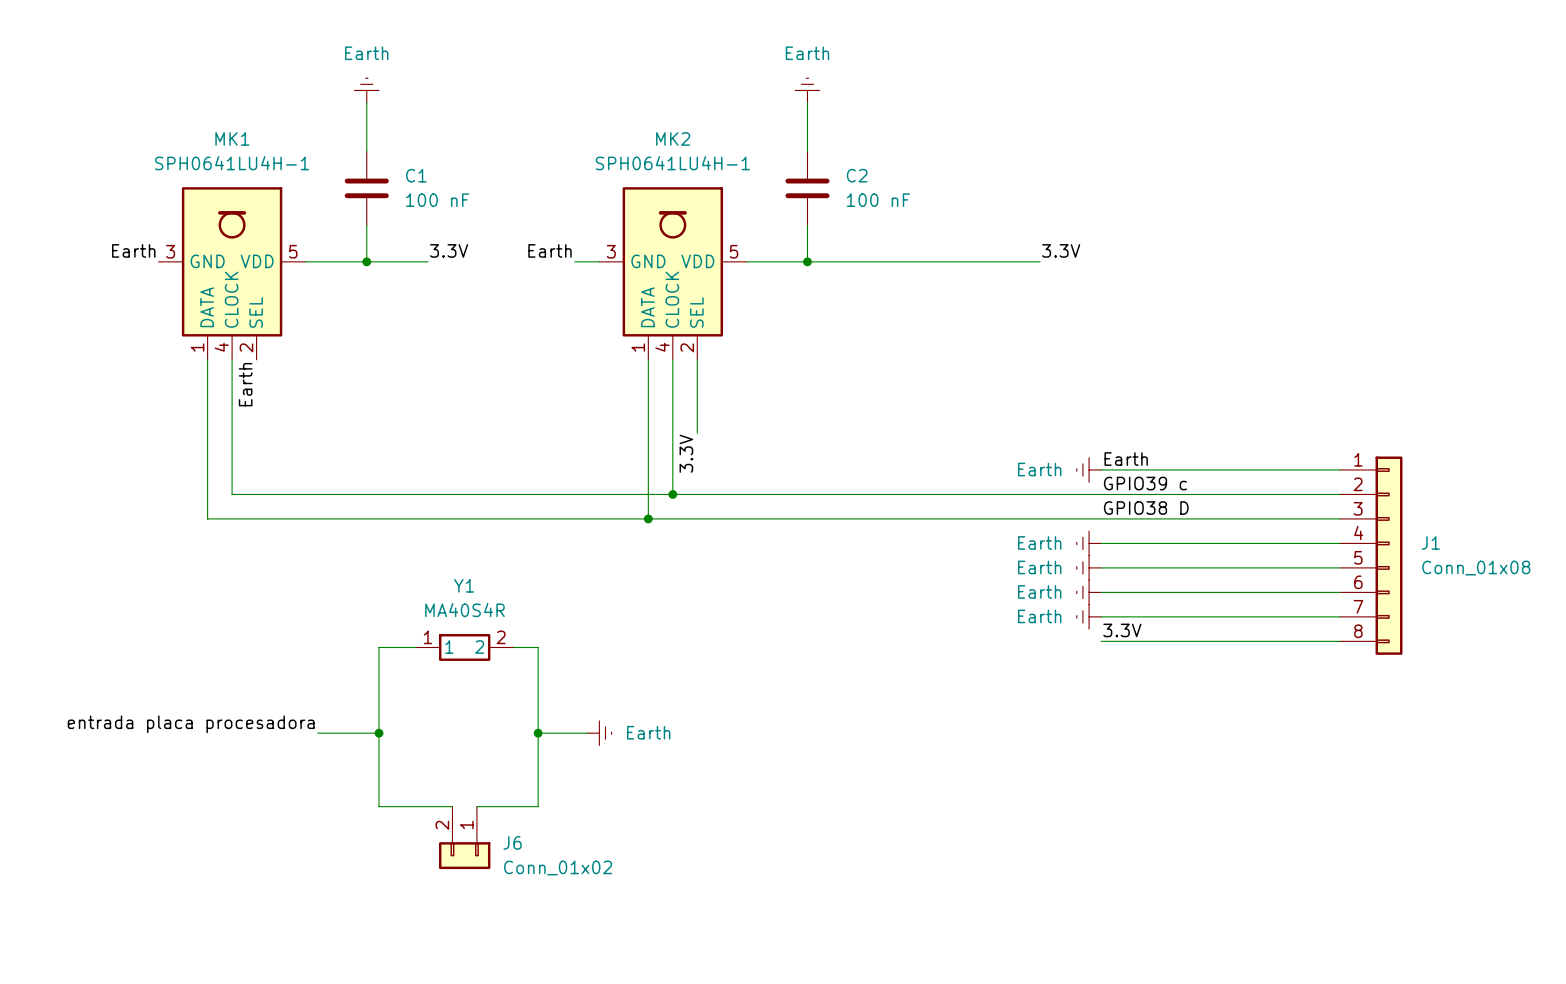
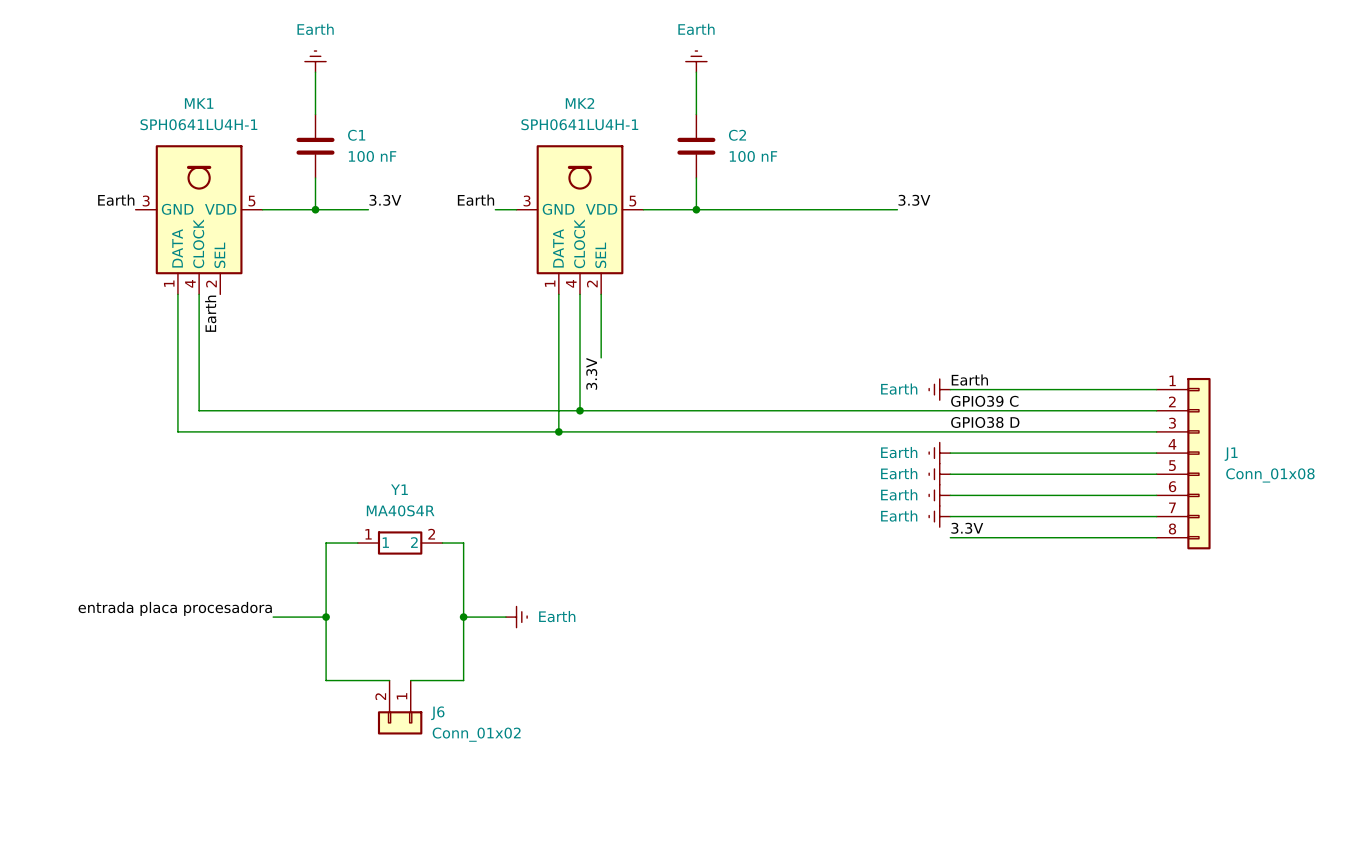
label: GPIO39 c (1145, 483) -> GPIO39 C (984, 401)

